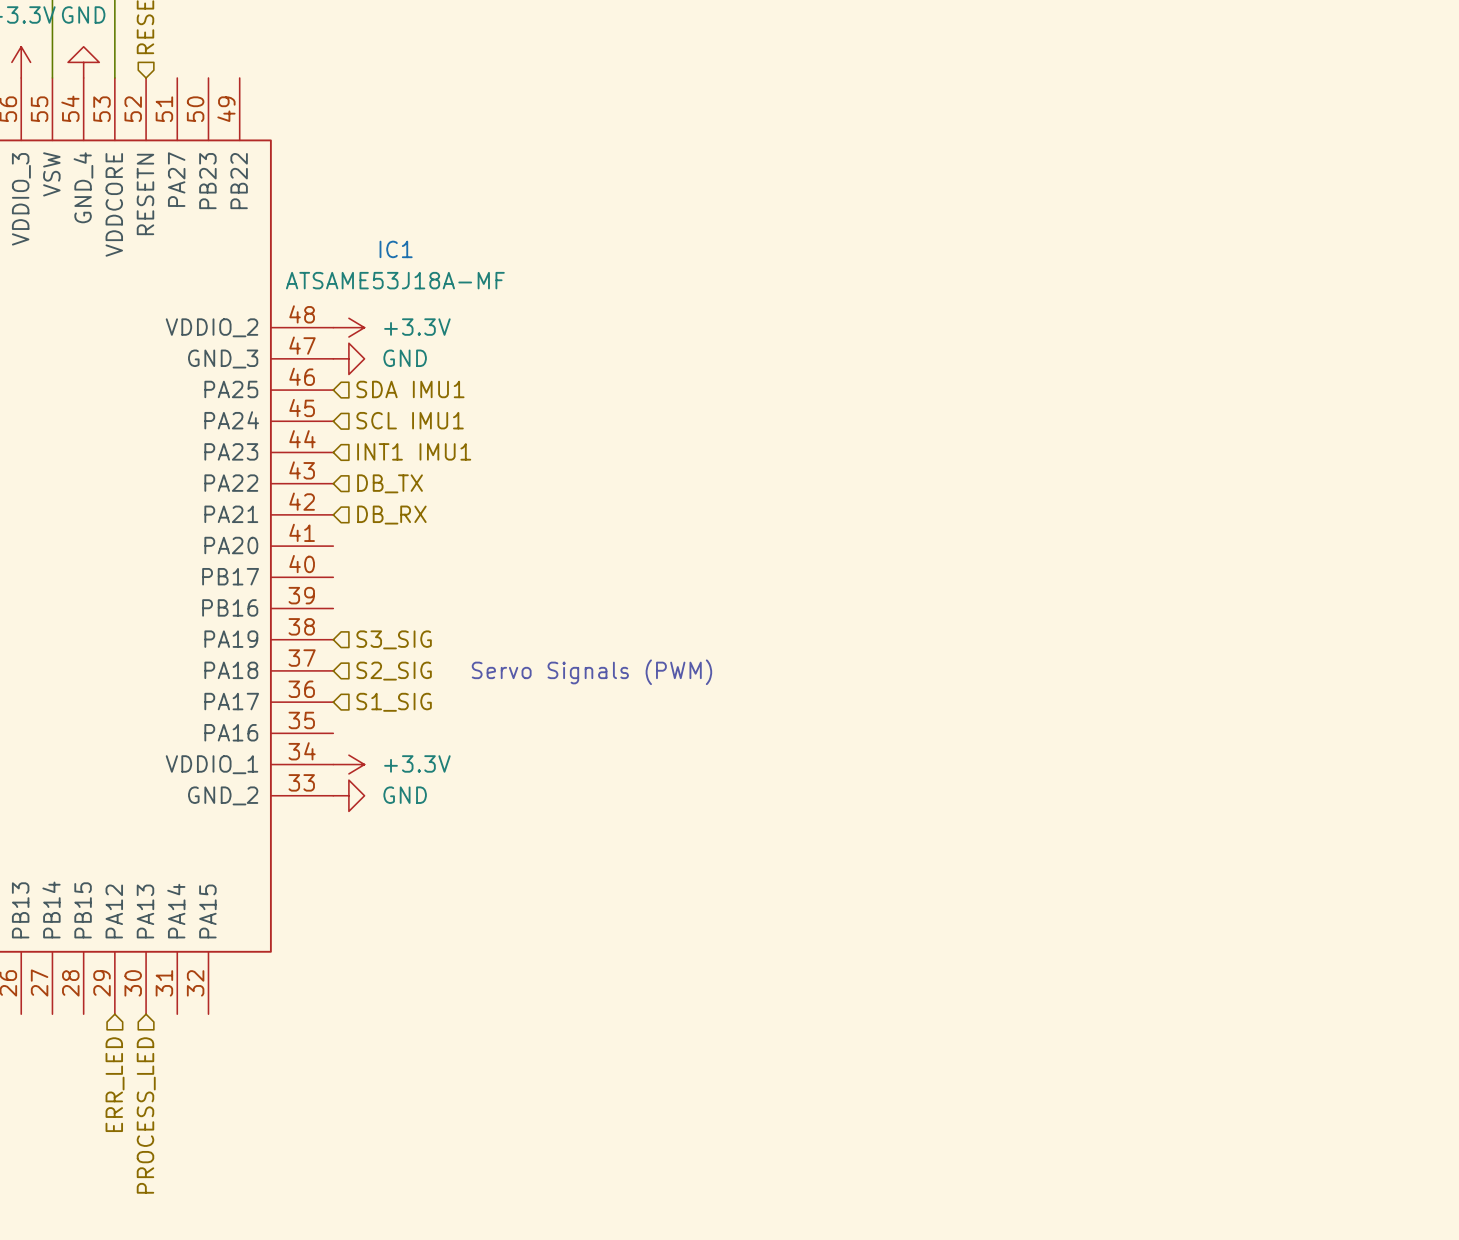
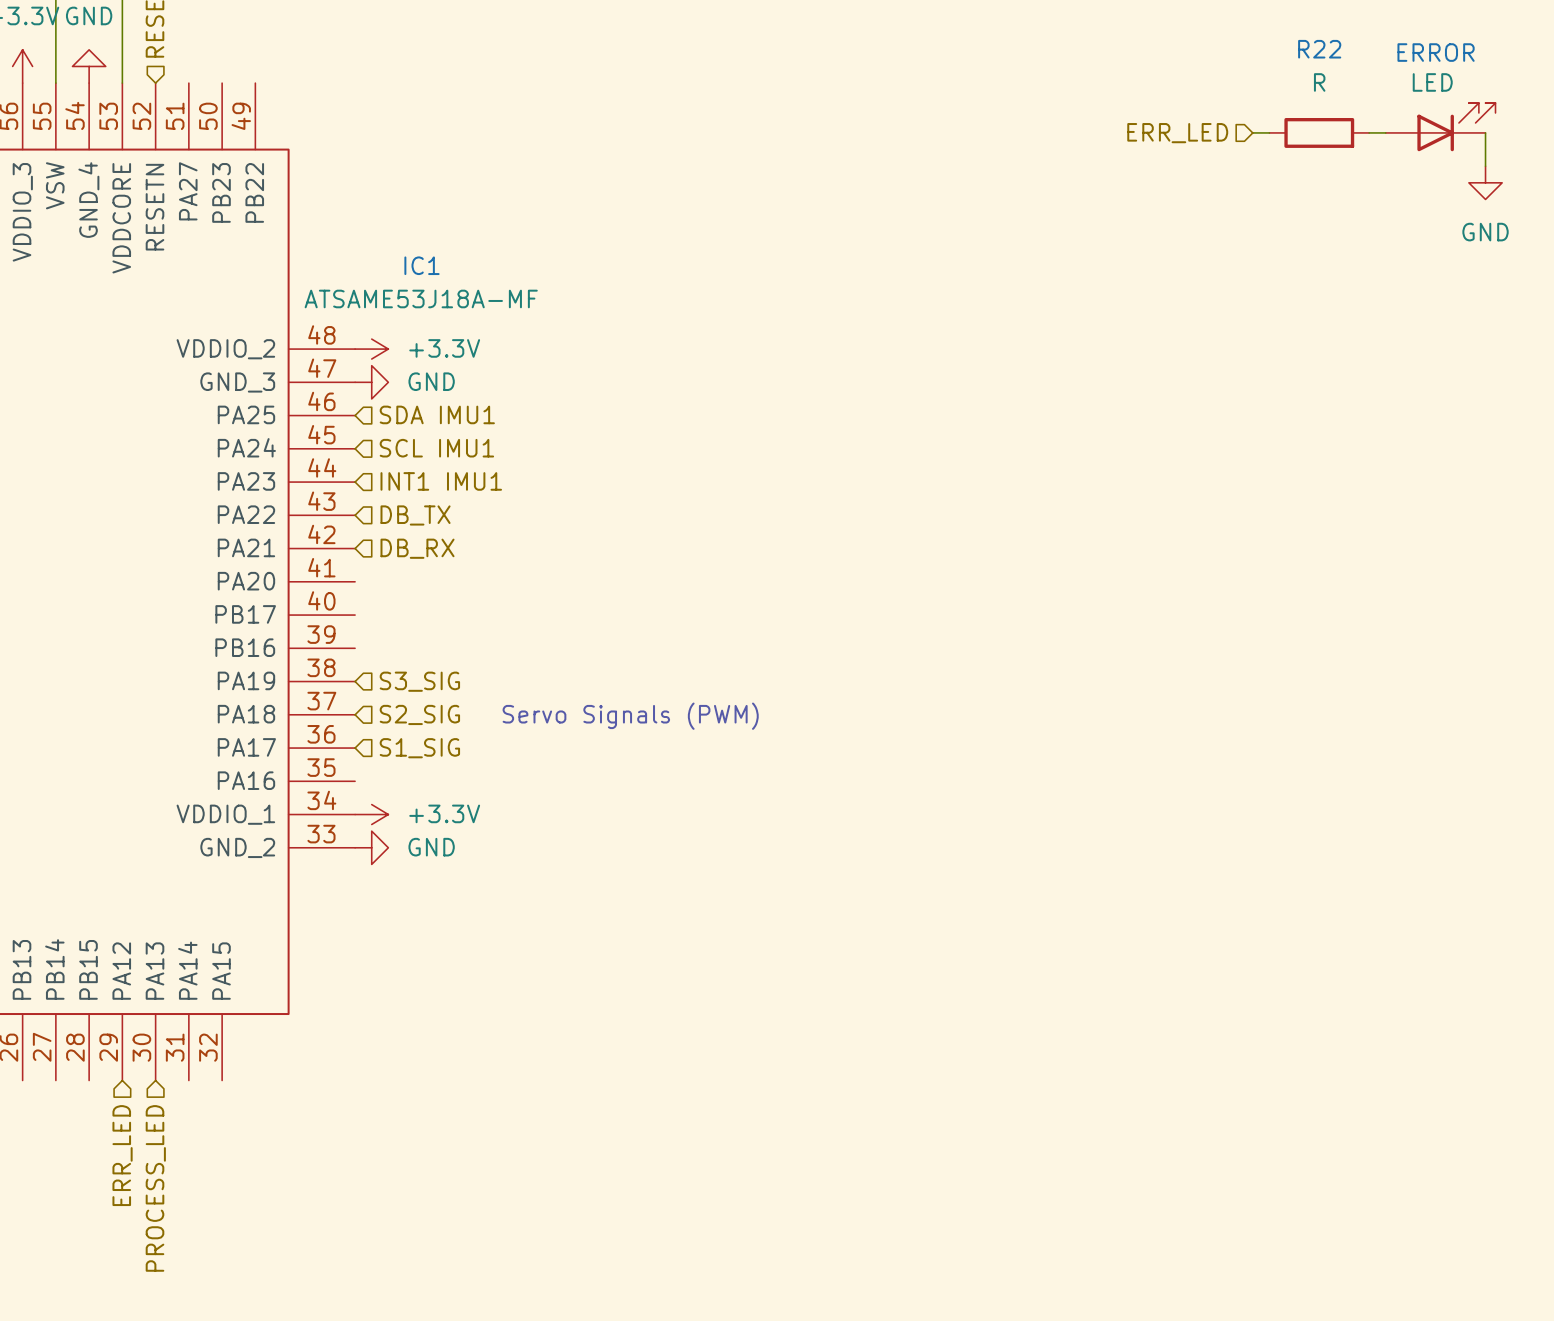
ERROR: none -> LED (1440, 127)
hierarchical label: none -> ERR_LED (1177, 133)
wire: none -> (1252, 132) (1269, 132)
R22: none -> R (1319, 132)
wire: none -> (1369, 132) (1385, 132)
wire: none -> (1485, 132) (1485, 166)
power symbol: none -> GND (1485, 182)

